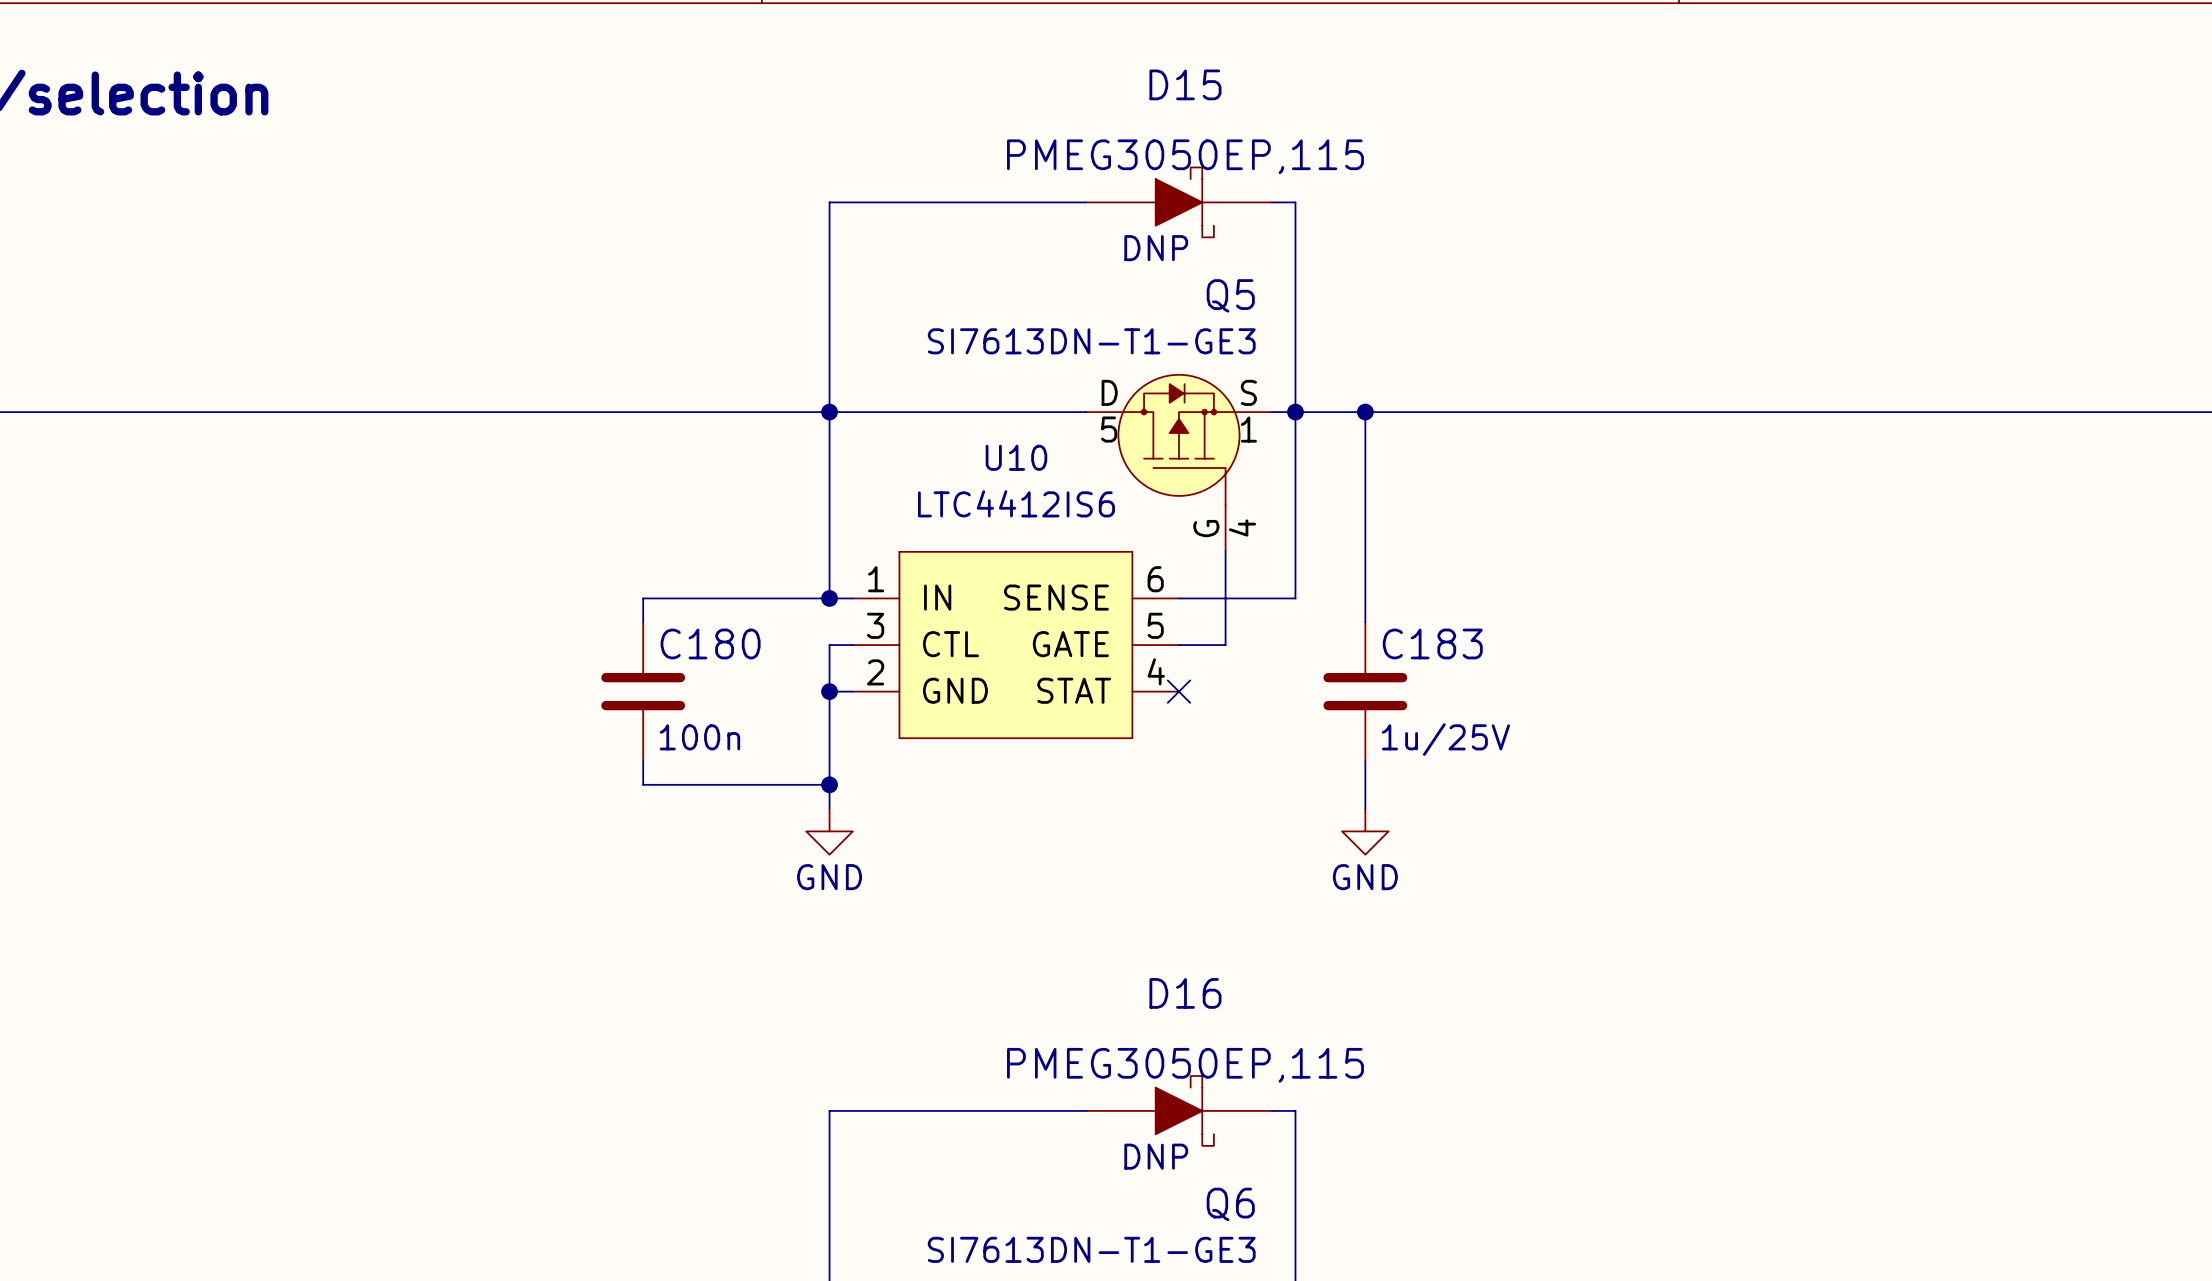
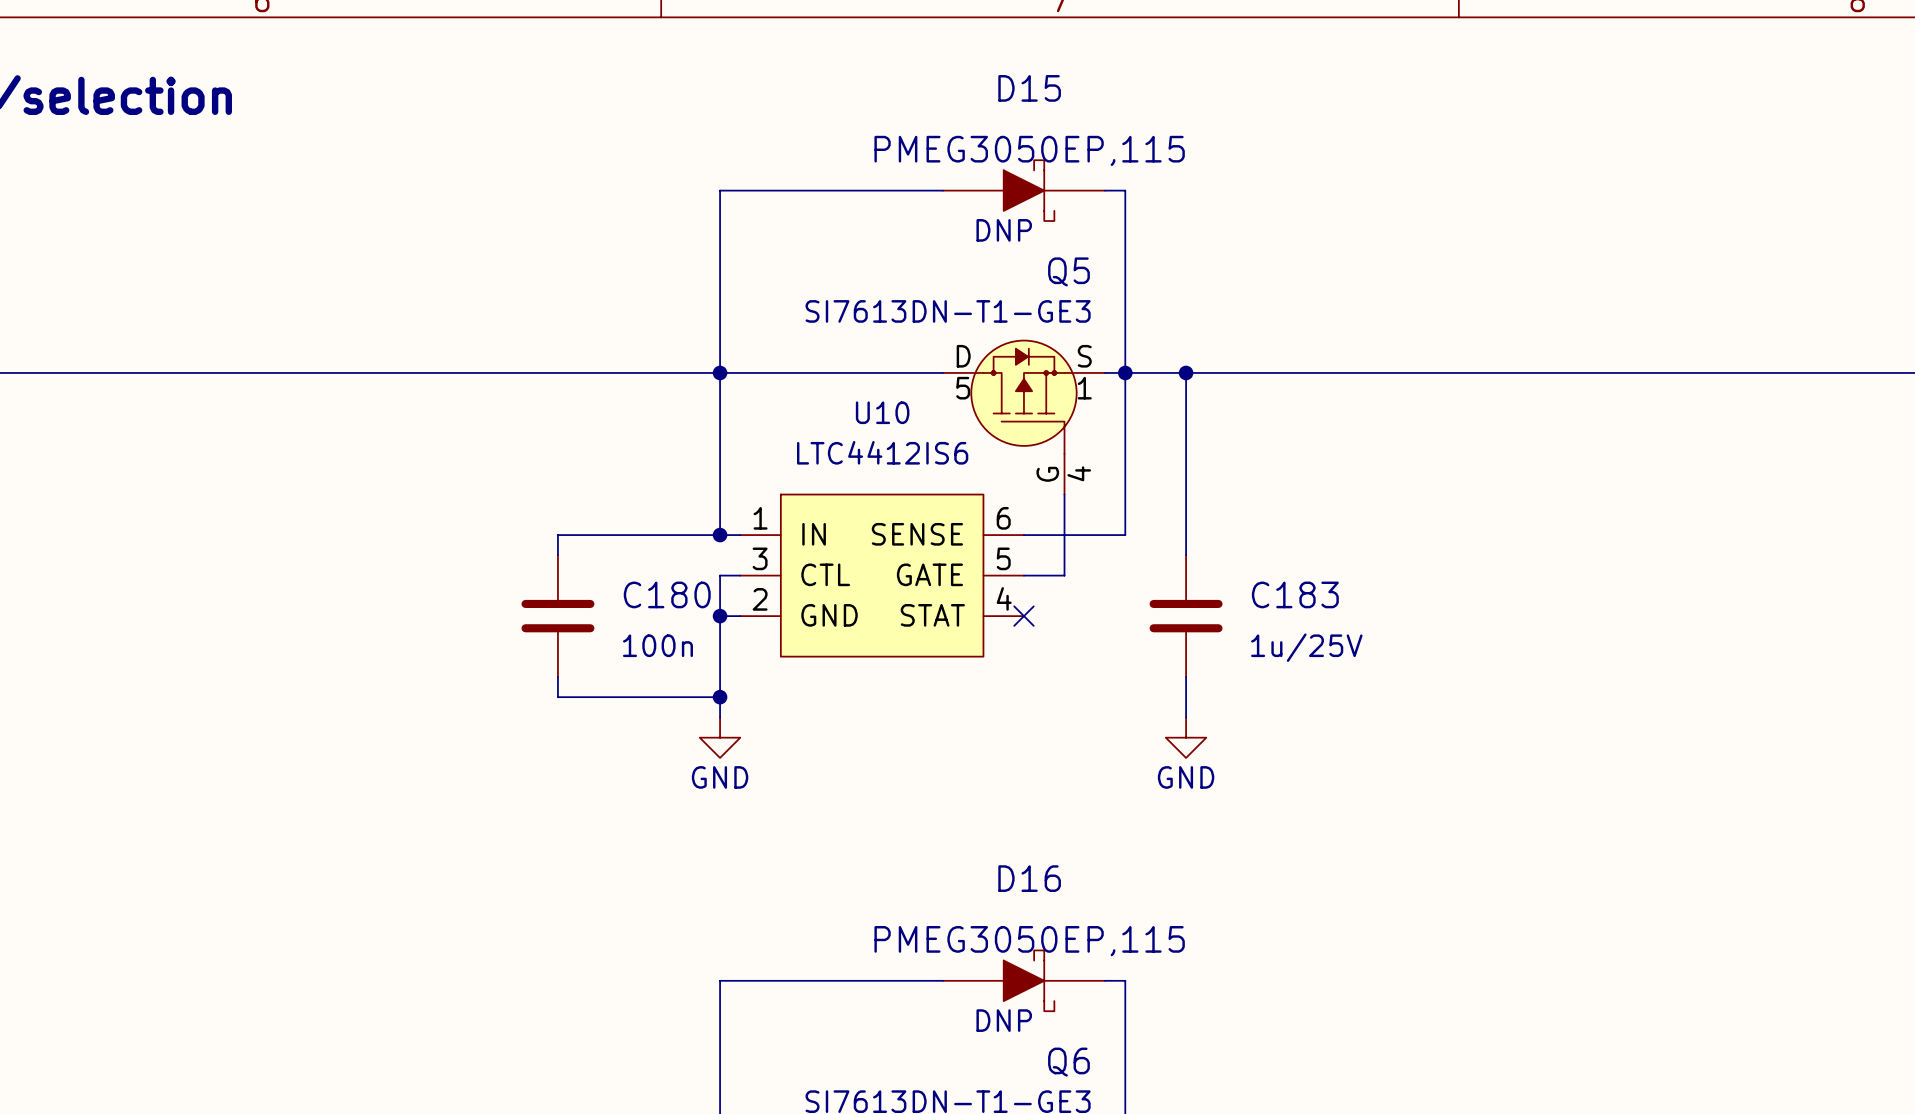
C180 name position: C180 (710, 643) -> C180 (667, 594)
C183 name position: C183 (1432, 643) -> C183 (1295, 594)
C180 text position: 100n (699, 737) -> 100n (657, 645)
C183 text position: 1u/25V (1445, 739) -> 1u/25V (1306, 647)

